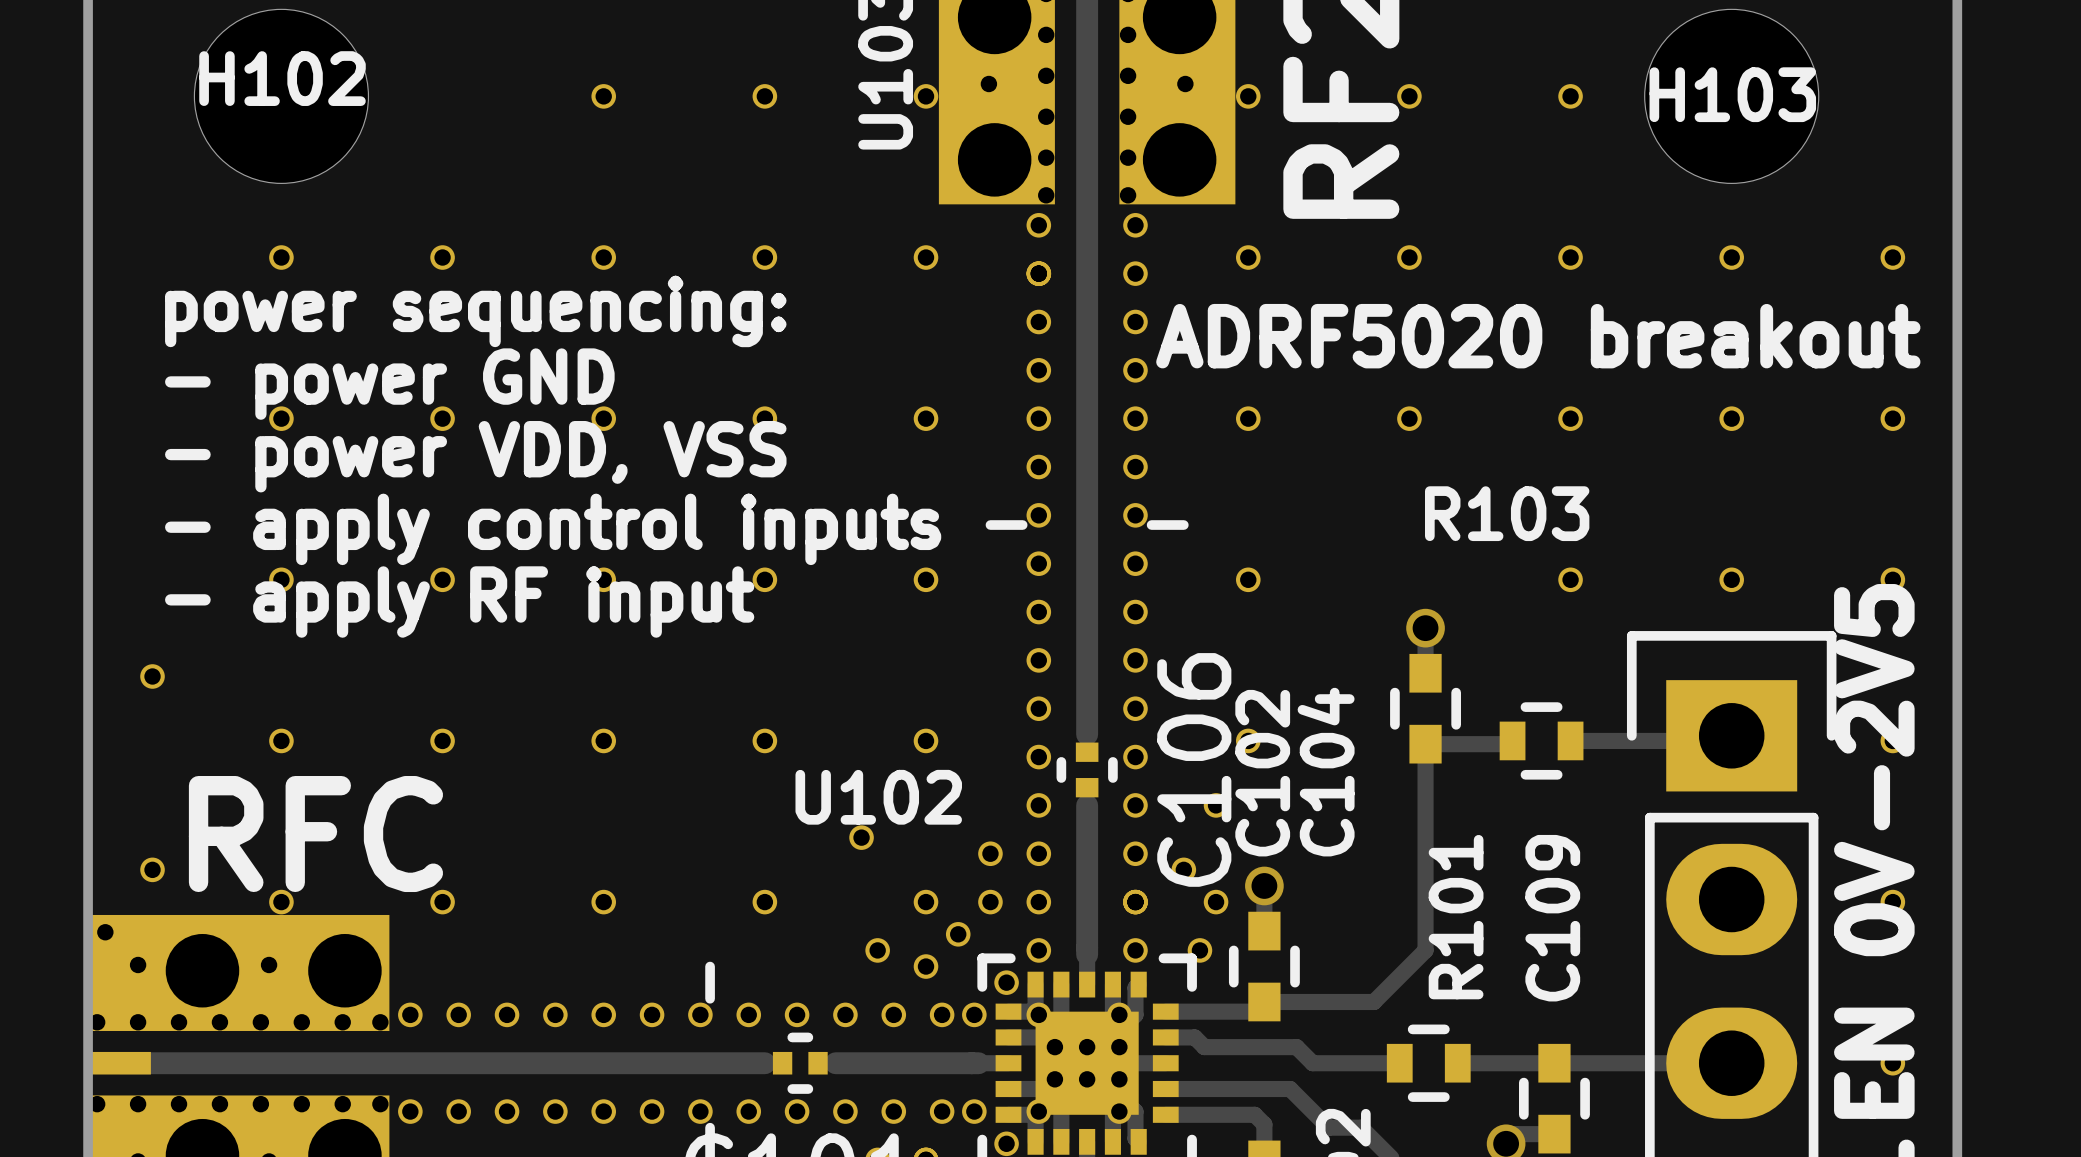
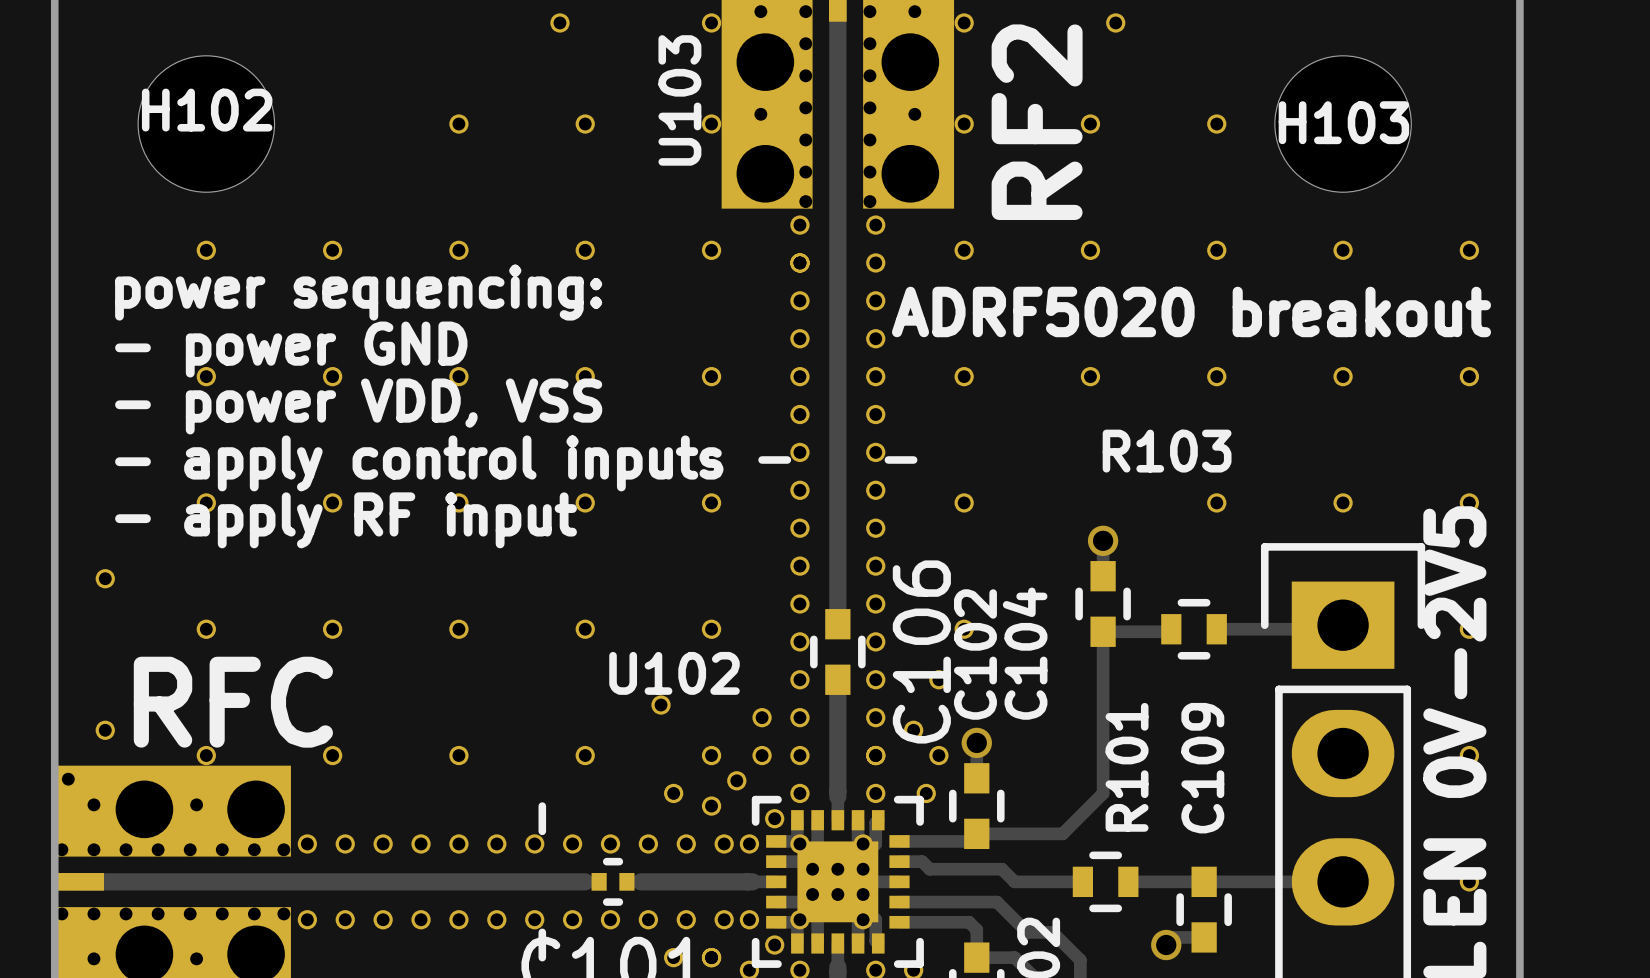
C106 footprint: [1056, 742, 1118, 798] -> [810, 609, 866, 695]

